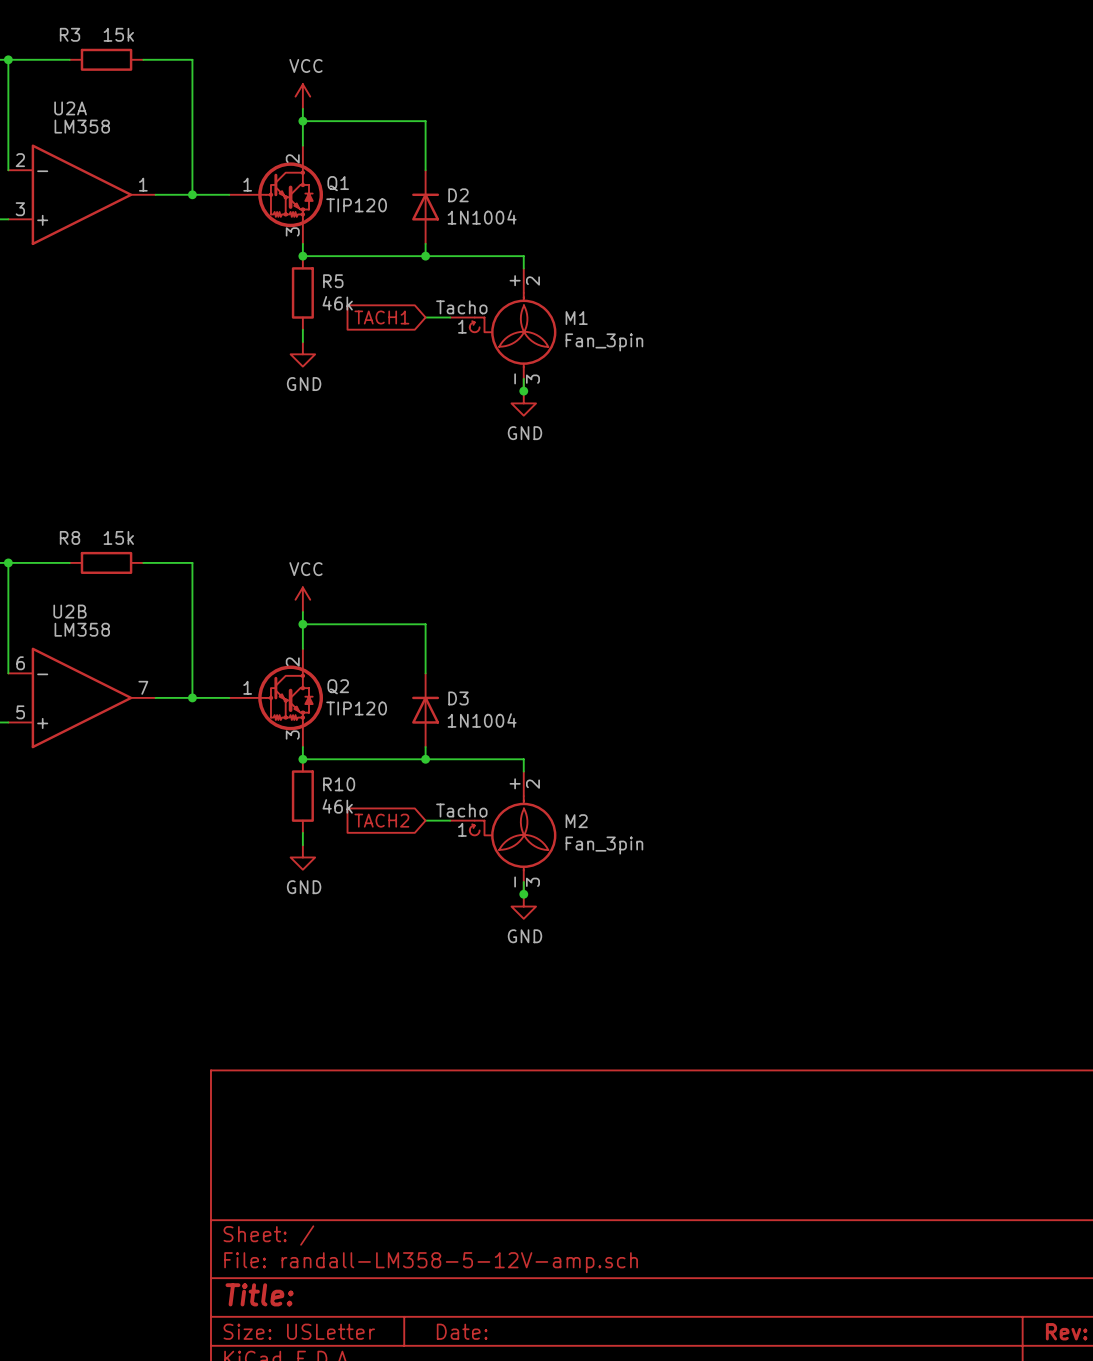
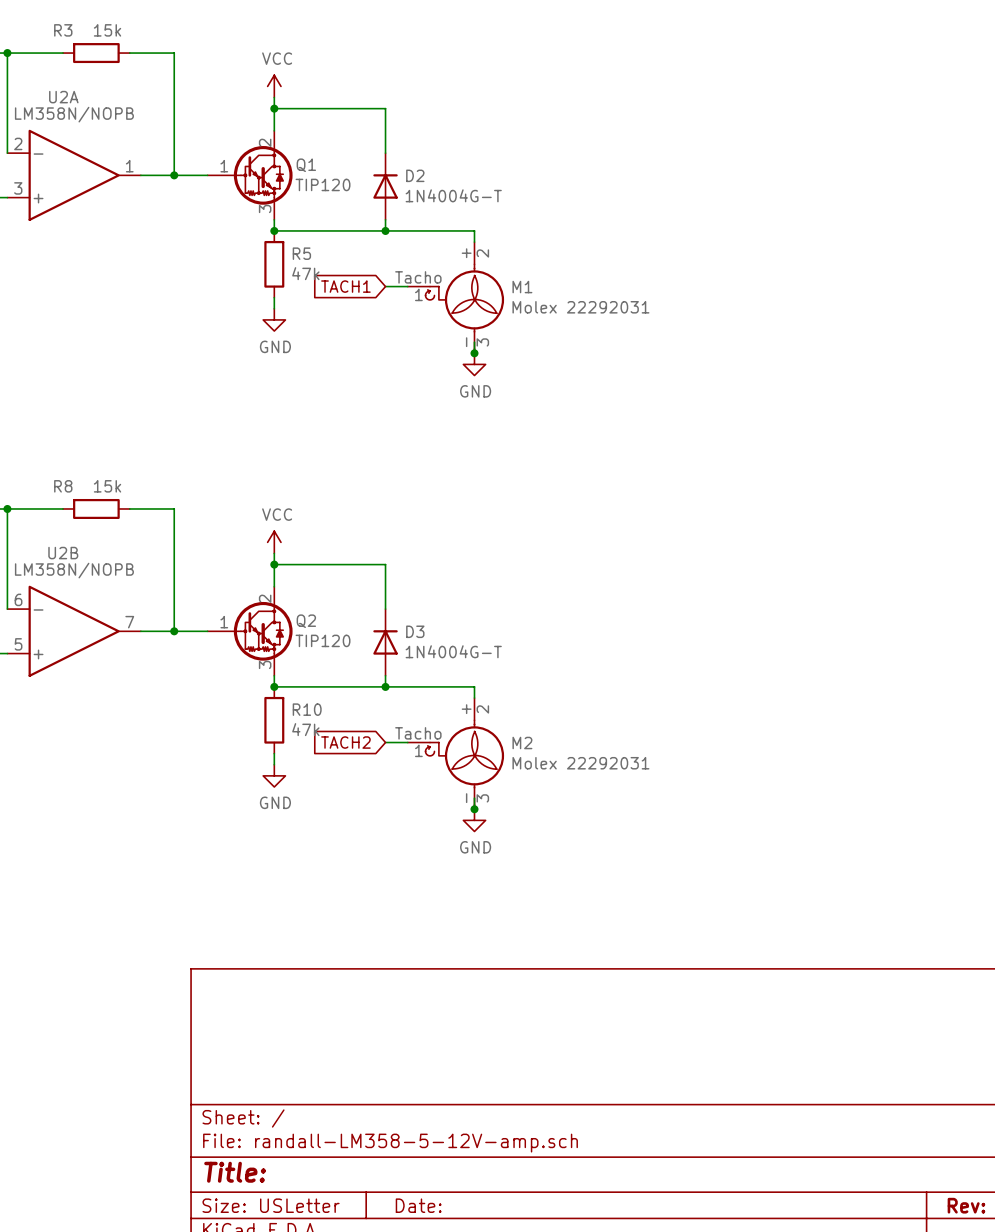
U2A value: LM358 (82, 126) -> LM358N/NOPB (74, 114)
D2 value: 1N1004 (482, 217) -> 1N4004G-T (453, 195)
R5 value: 46k (337, 303) -> 47k (305, 273)
M1 value: Fan_3pin (604, 342) -> Molex 22292031 (580, 307)
U2B value: LM358 (82, 629) -> LM358N/NOPB (74, 570)
D3 value: 1N1004 (482, 720) -> 1N4004G-T (453, 651)
R10 value: 46k (337, 806) -> 47k (305, 729)
M2 value: Fan_3pin (604, 845) -> Molex 22292031 (580, 763)

